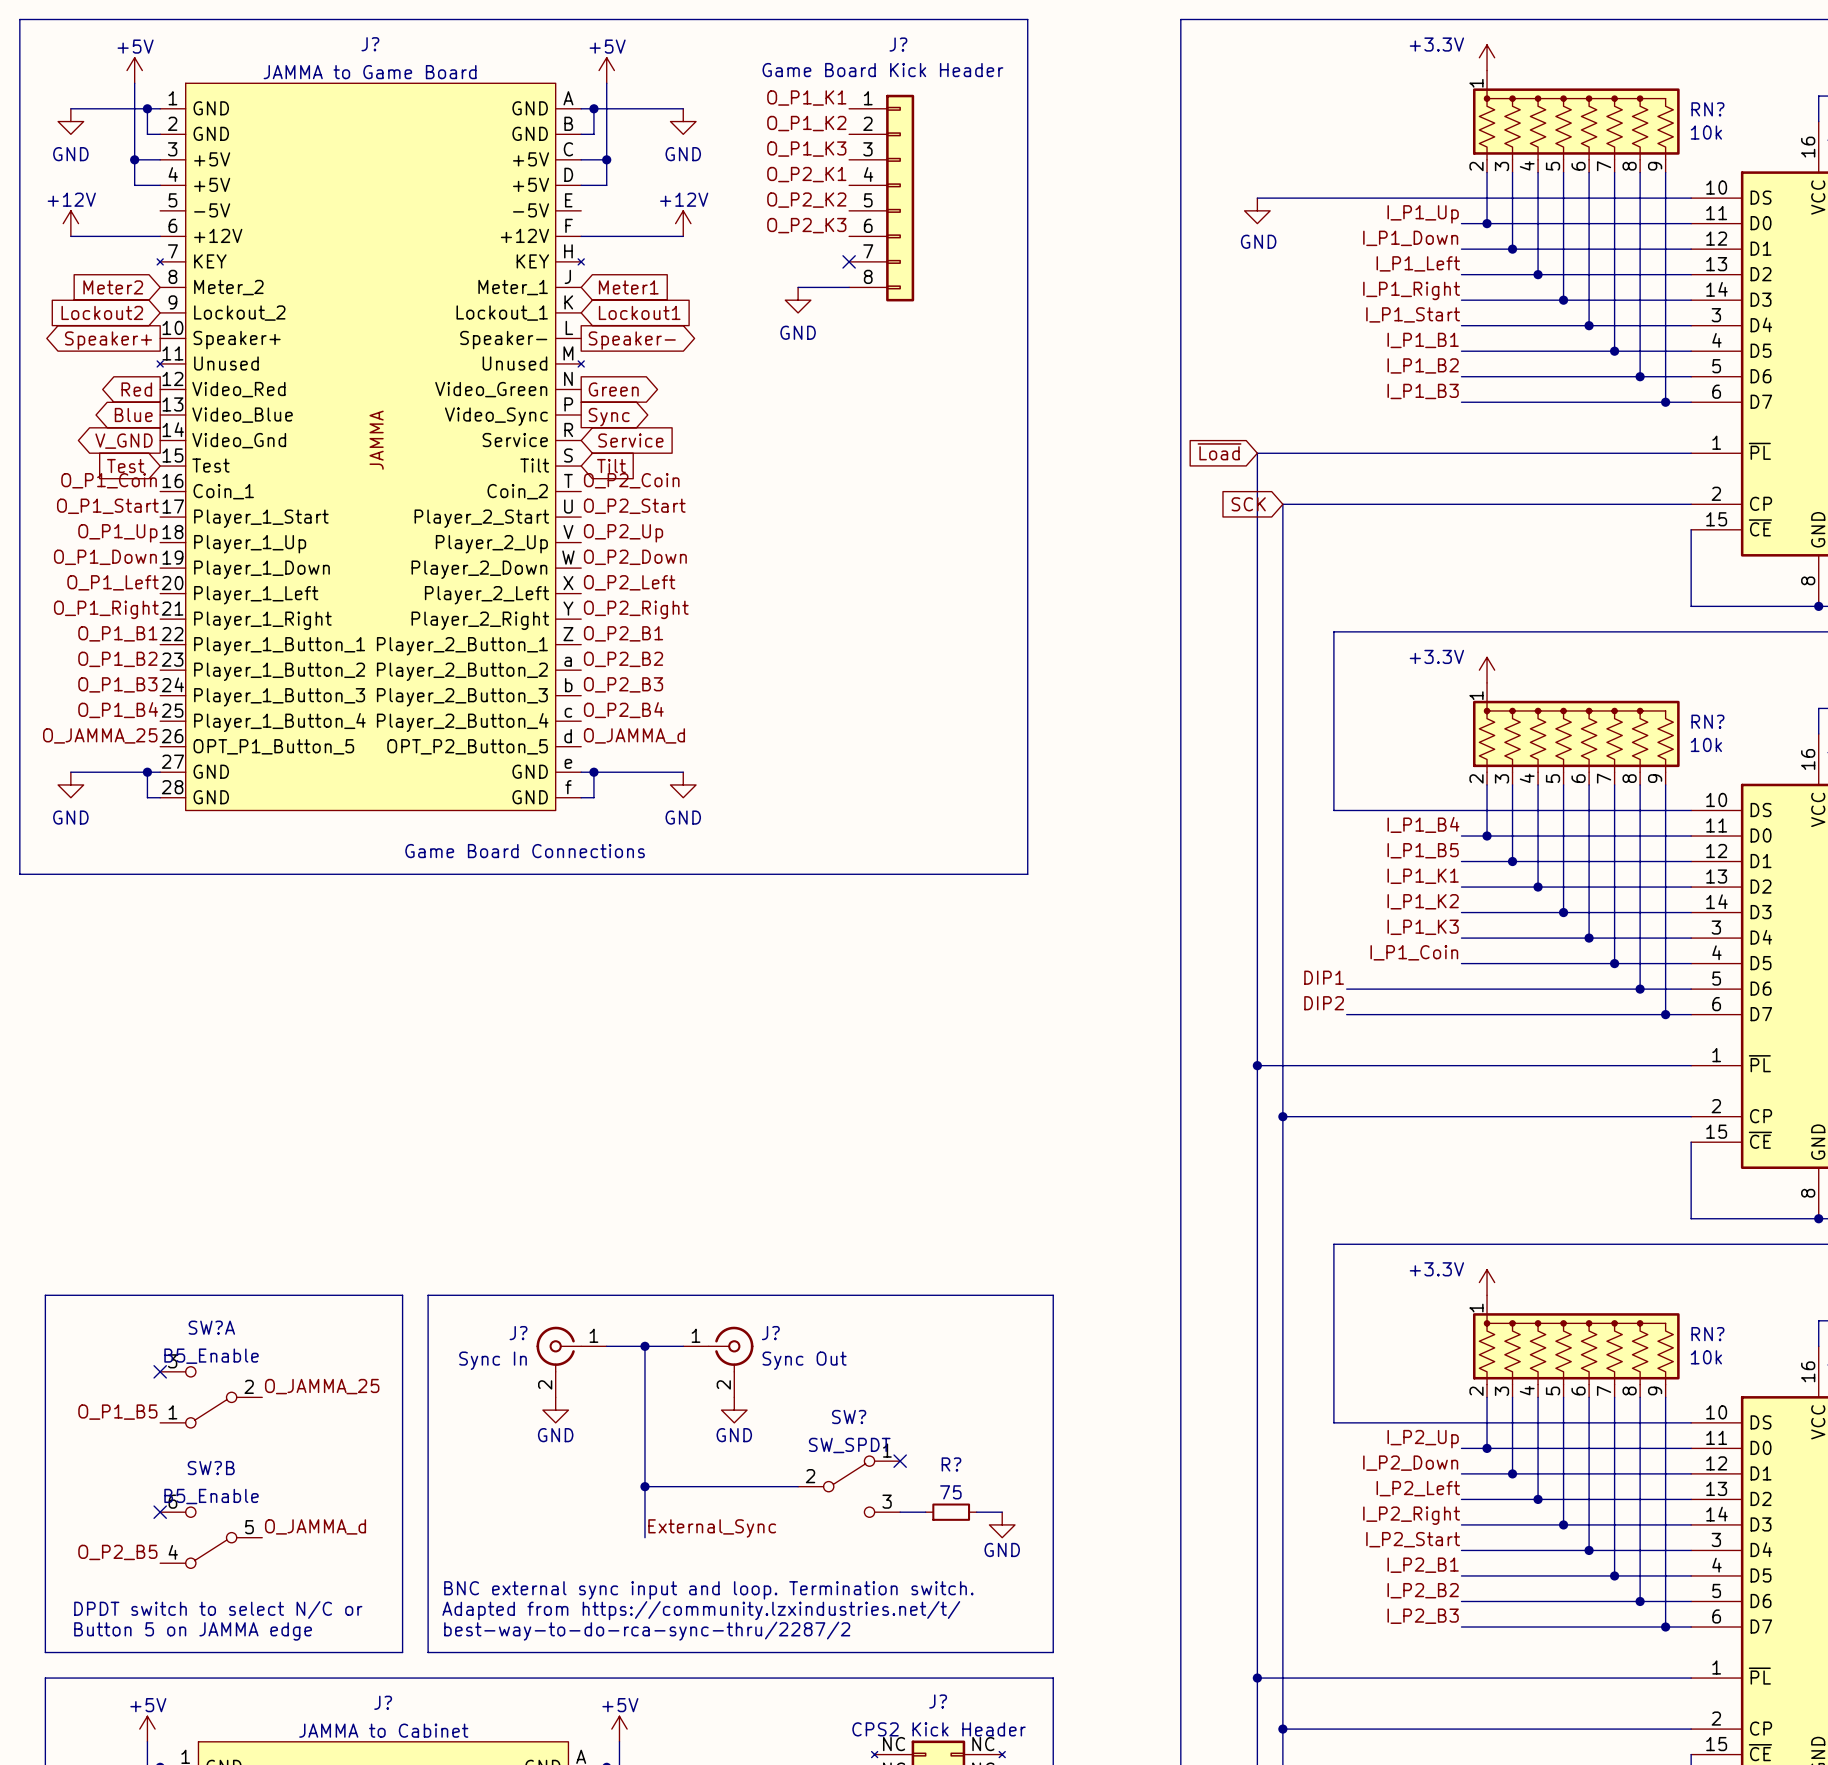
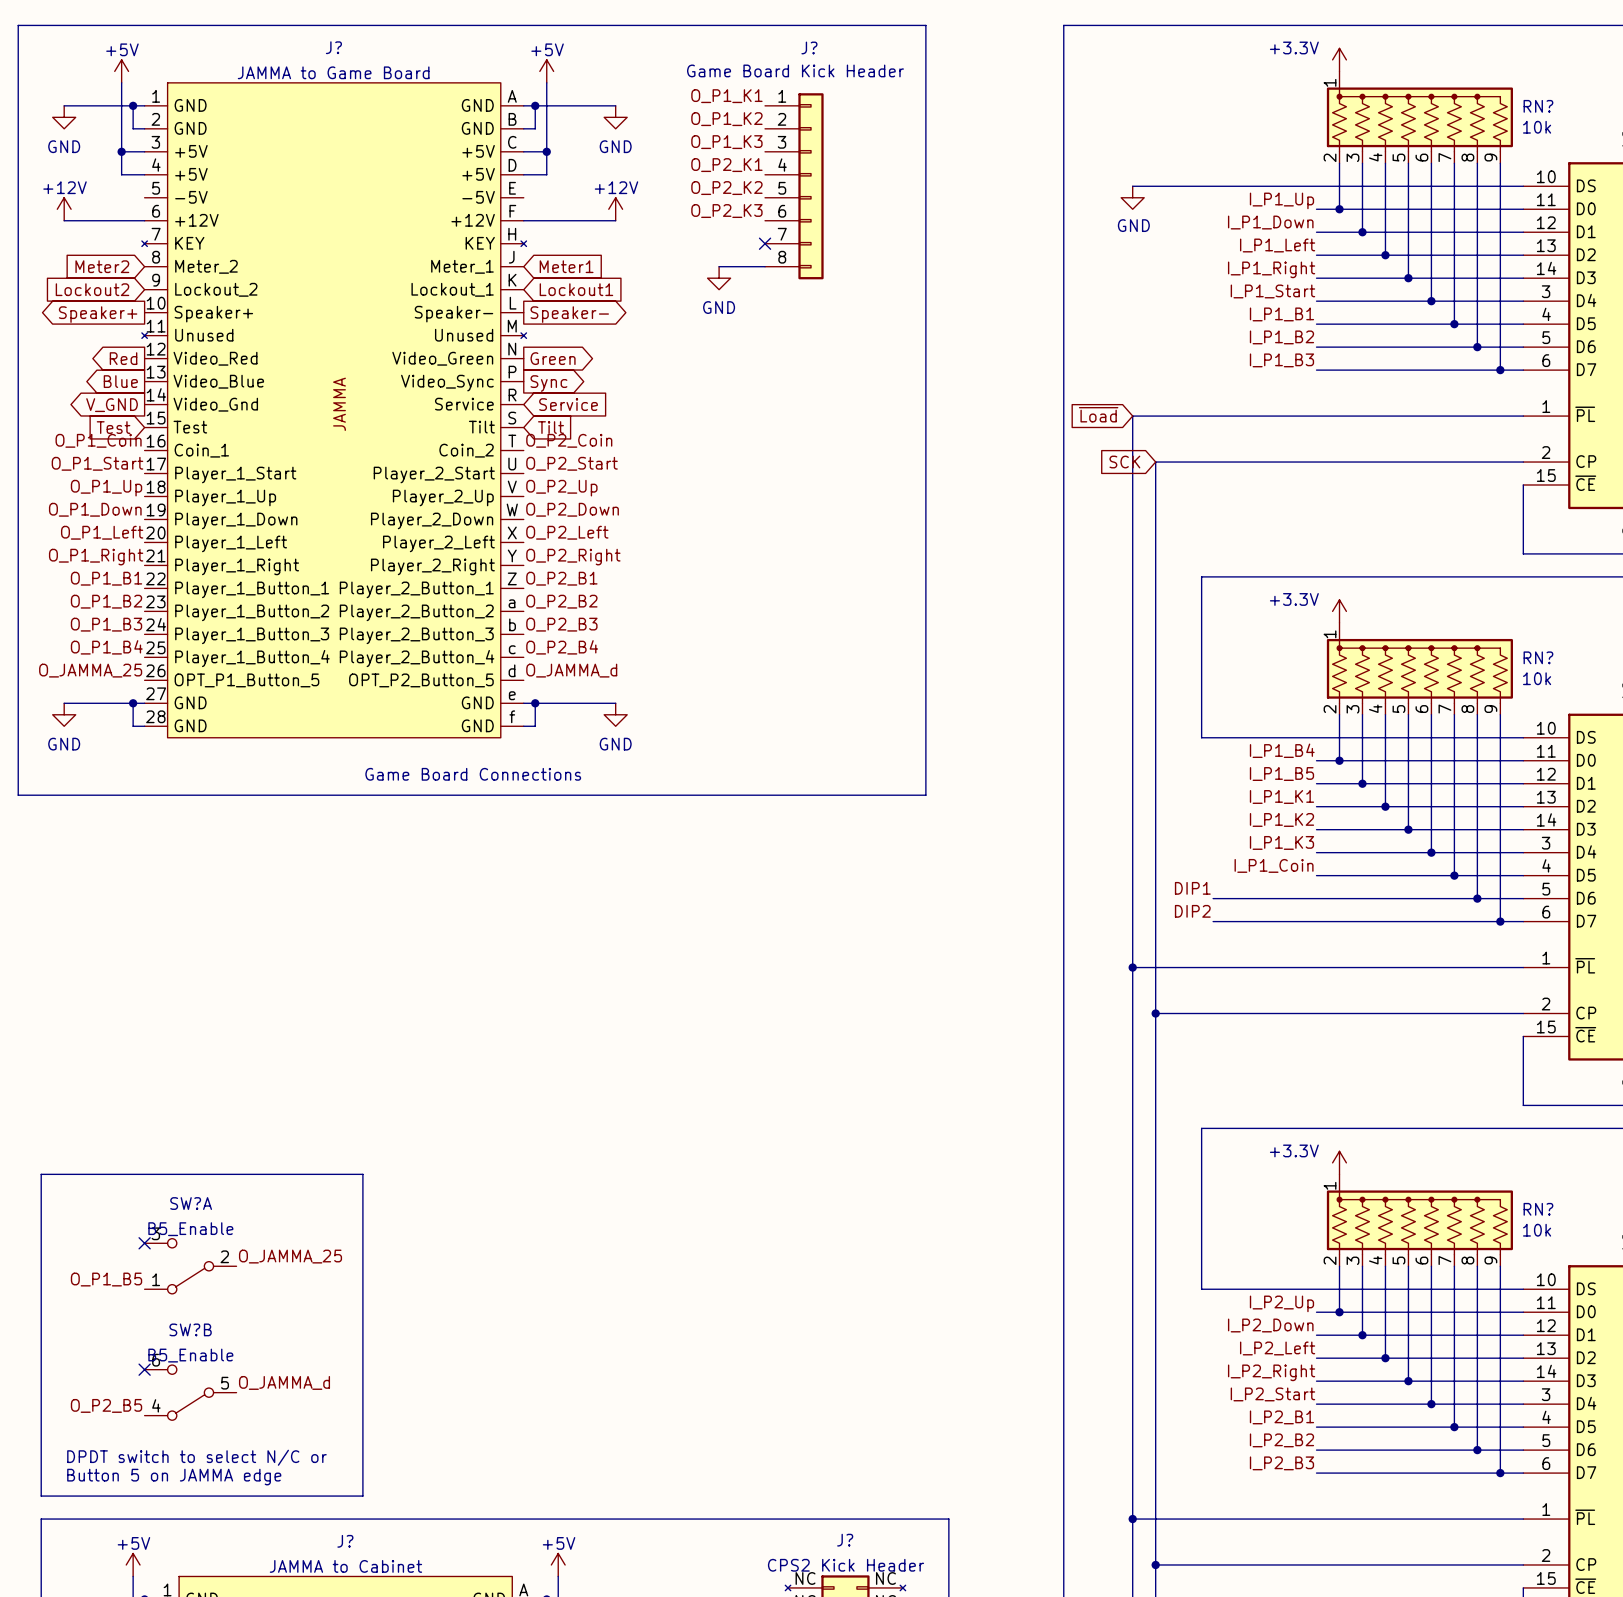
line: (428, 1295) (1053, 1295) (1053, 1652) (428, 1652) (428, 1295) -> none
wire: (606, 1346) (683, 1346) -> none
wire: (644, 1346) (644, 1537) -> none
junction: (644, 1346) -> none
J?: Sync In (571, 1362) -> none
J?: Sync Out (718, 1362) -> none
power symbol: GND (555, 1410) -> none
power symbol: GND (734, 1410) -> none
no-connect mark: (900, 1461) -> none
wire: (644, 1486) (798, 1486) -> none
junction: (644, 1486) -> none
SW?: SW_SPDT (849, 1486) -> none
wire: (900, 1512) (925, 1512) -> none
R?: 75 (951, 1512) -> none
wire: (976, 1512) (1002, 1512) -> none
power symbol: GND (1002, 1524) -> none
label: External_Sync (712, 1528) -> none
text: BNC external sync input and loop. Termination switch. (708, 1590) -> none
text: Adapted from https://community.lzxindustries.net/t/ (701, 1610) -> none
text: best-way-to-do-rca-sync-thru/2287/2 (647, 1631) -> none

